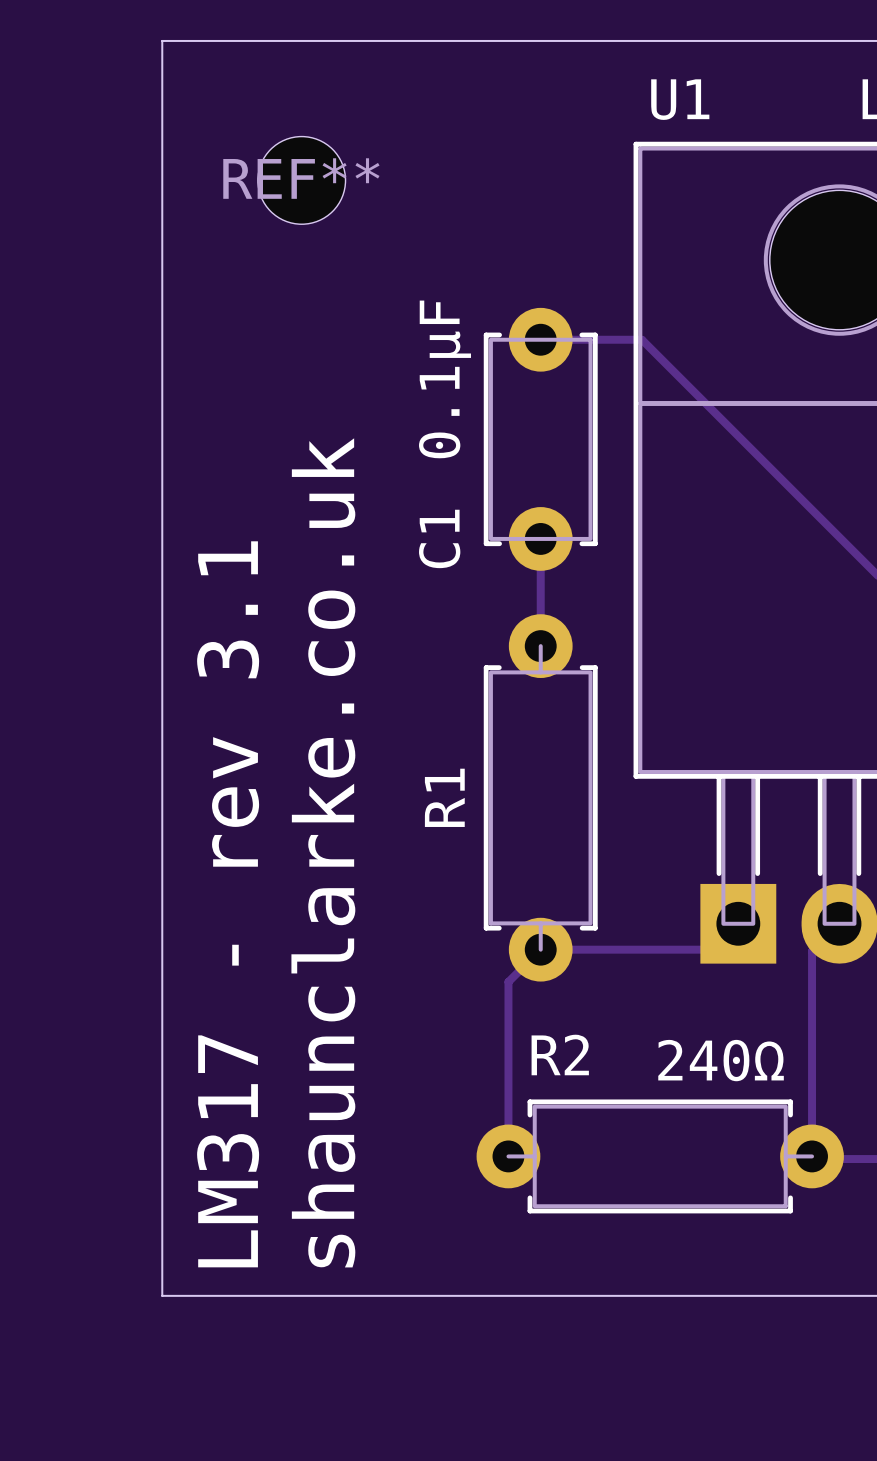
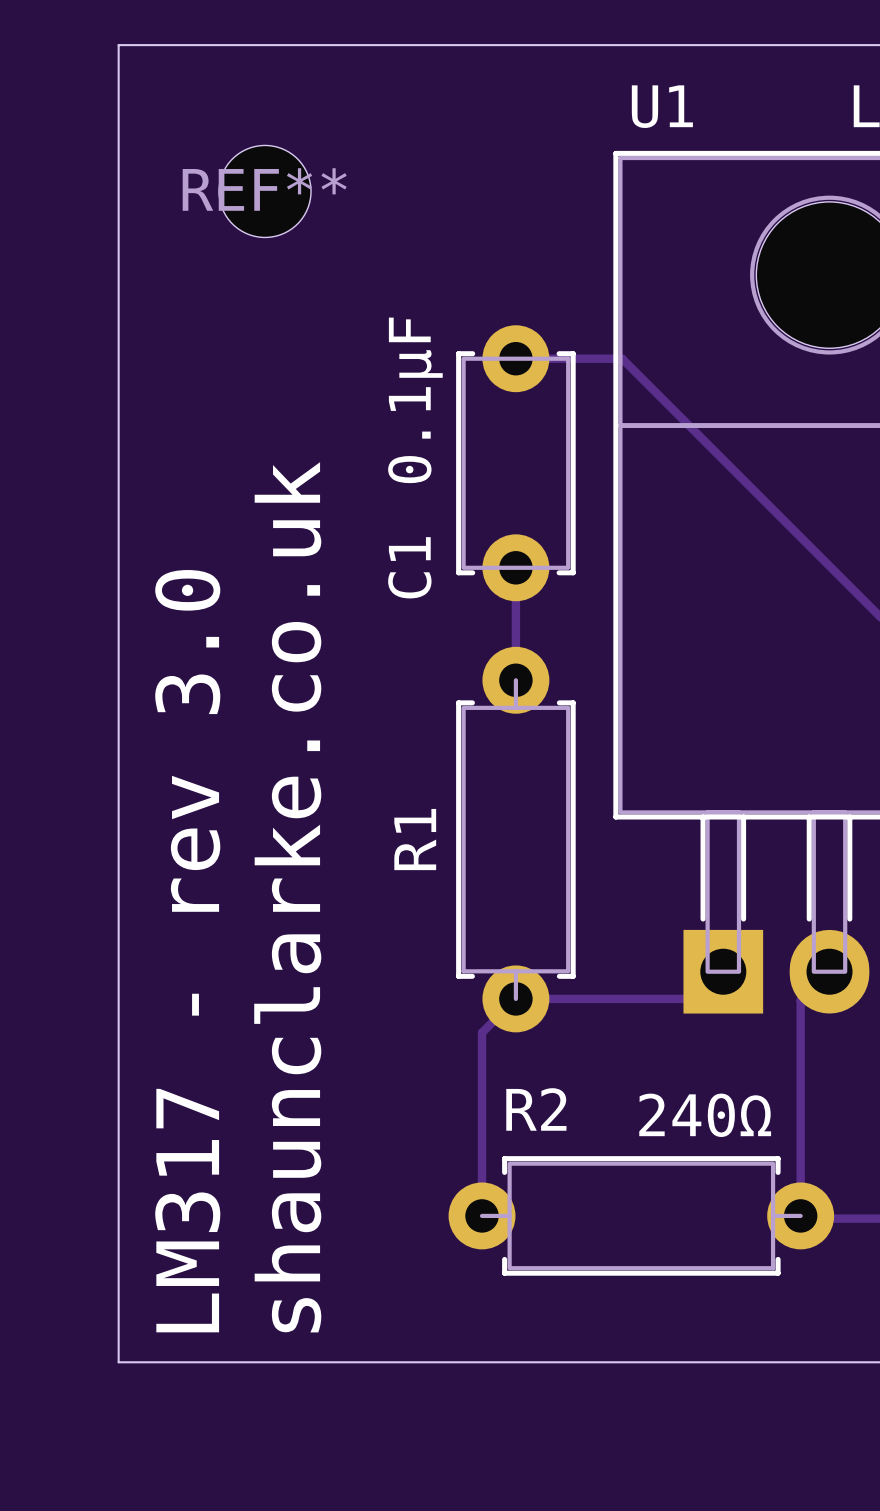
text: LM317 - rev 3.1 (228, 904) -> LM317 - rev 3.0 (187, 951)

